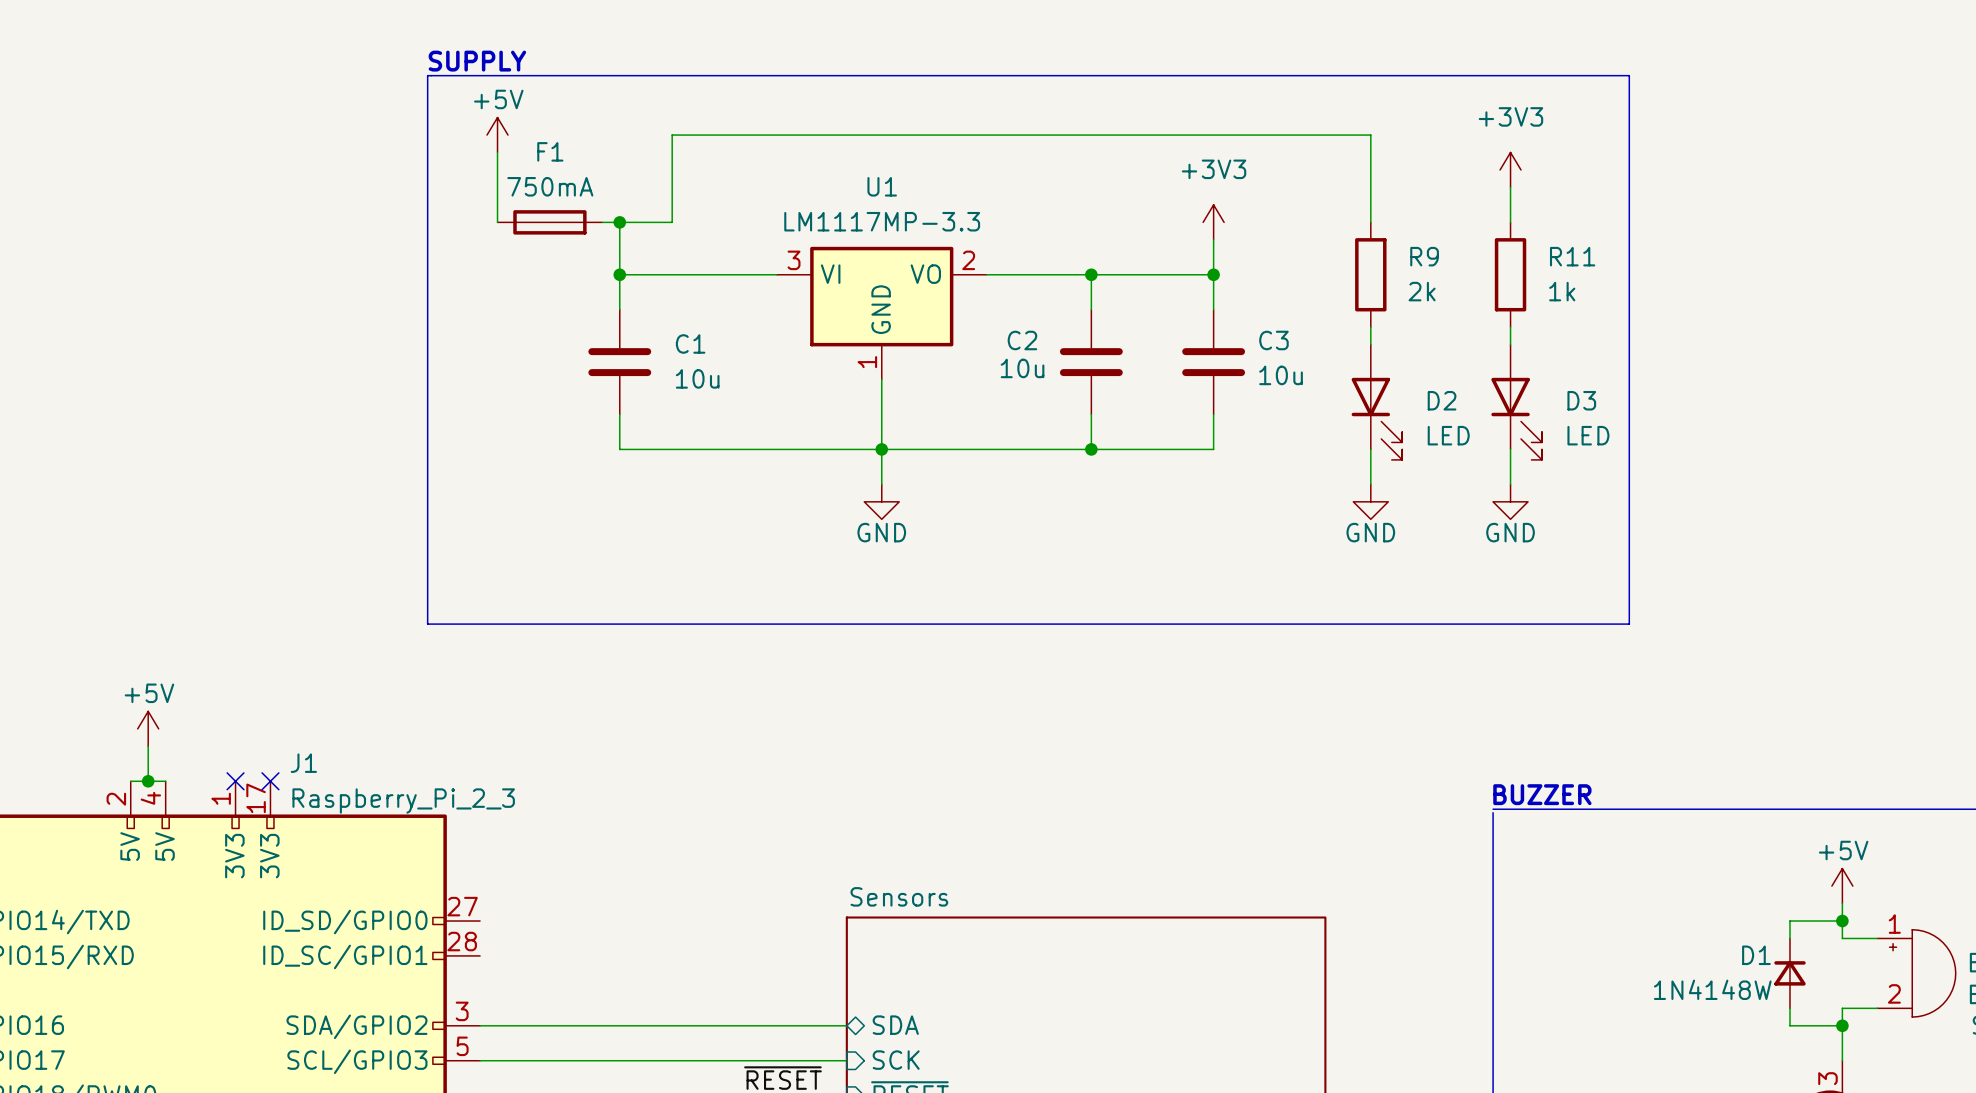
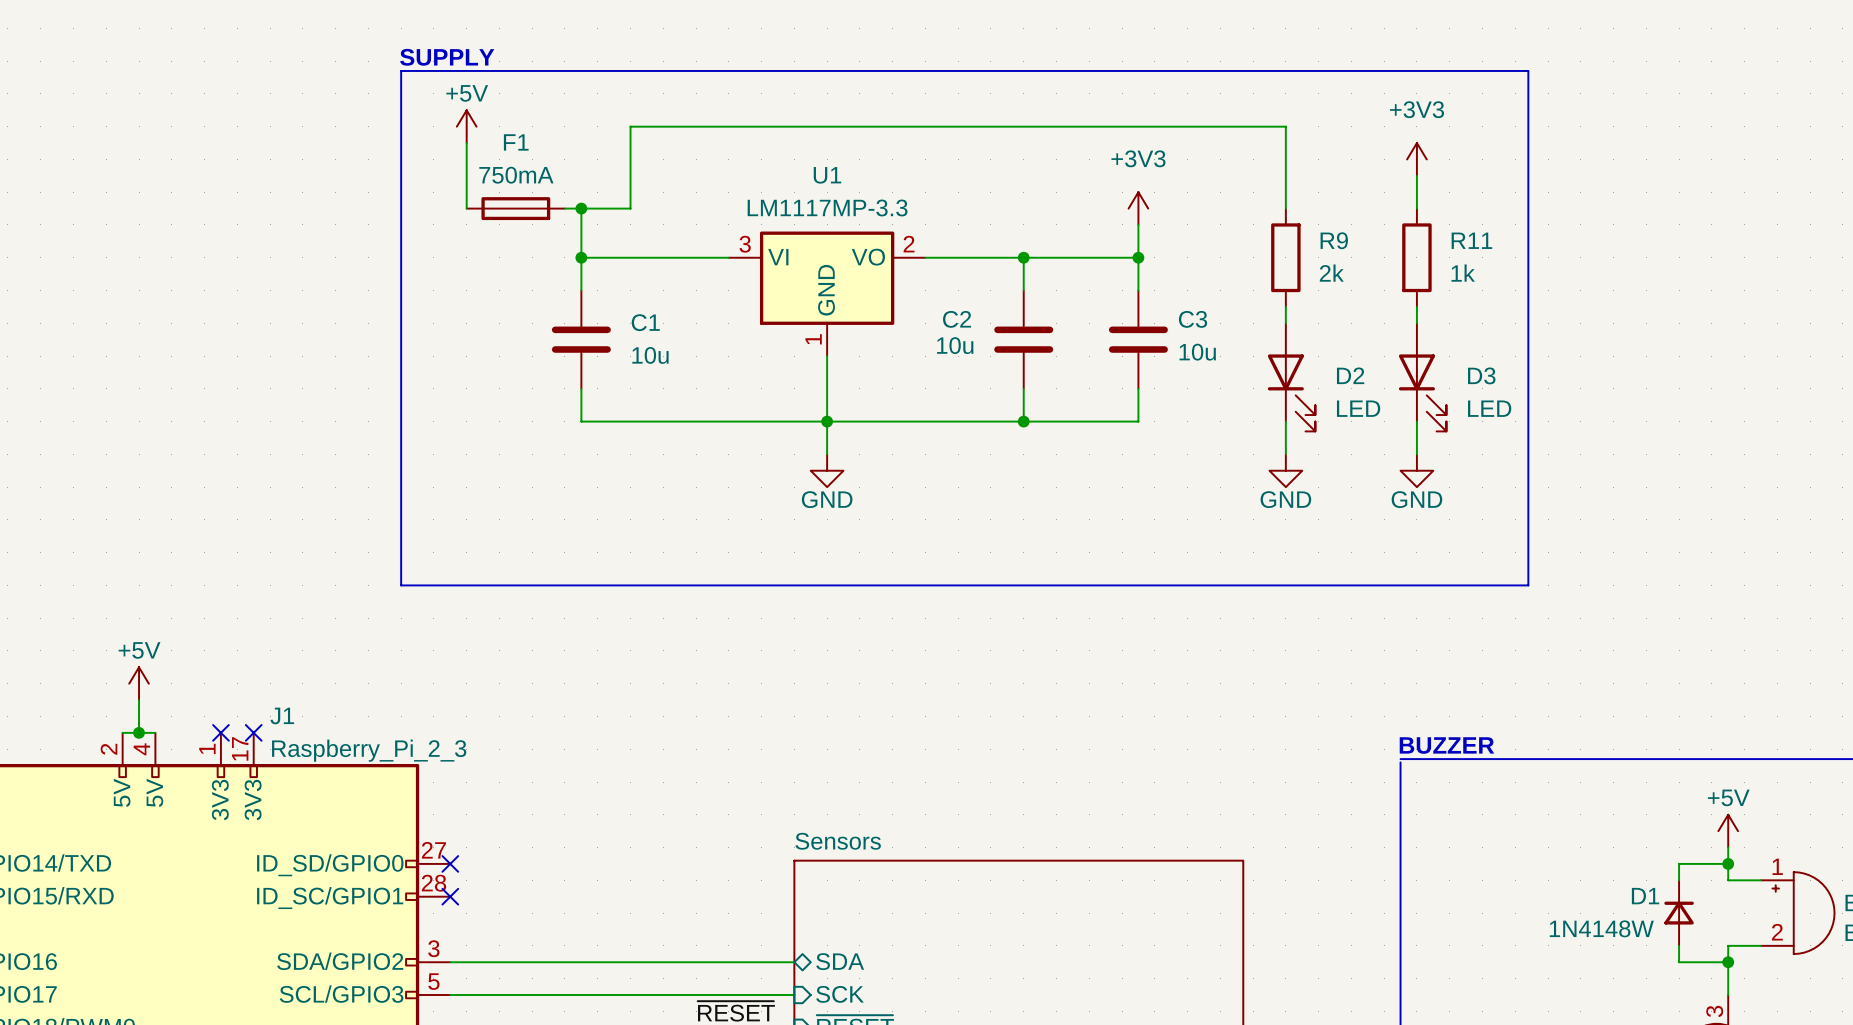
no-connect mark: none -> (450, 863)
no-connect mark: none -> (450, 896)

